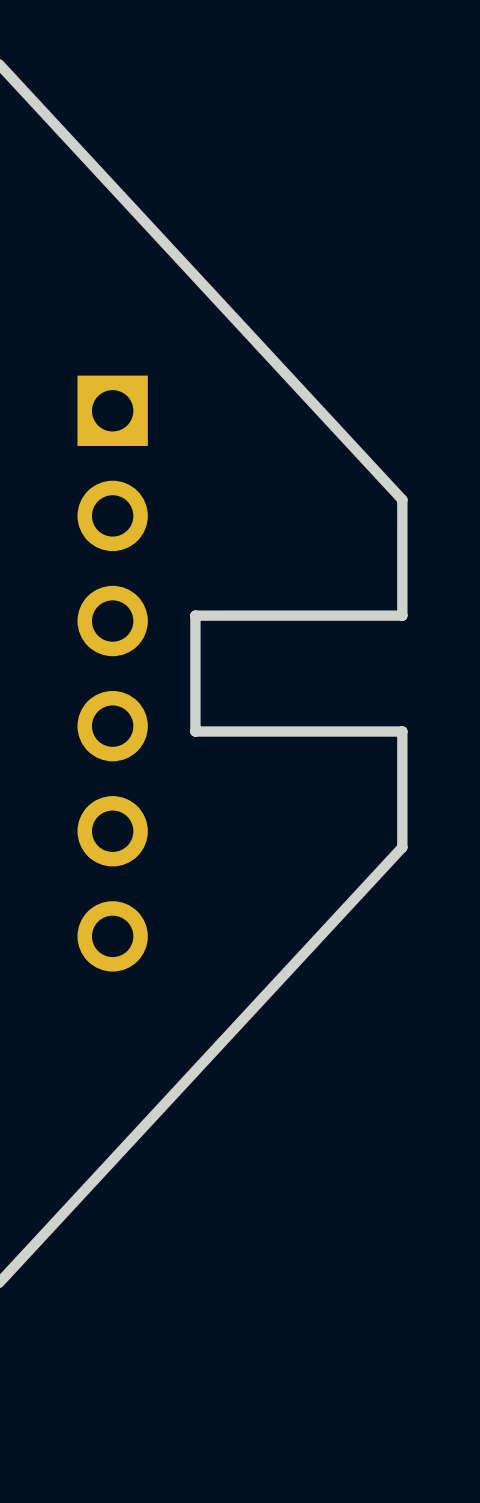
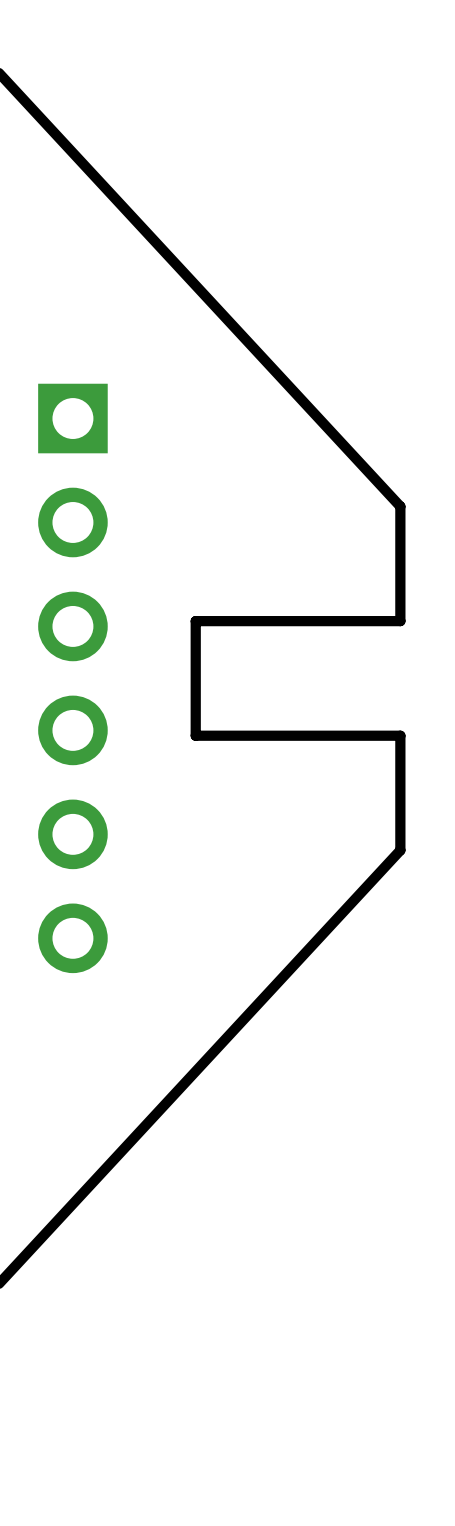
part position: (112, 673) -> (72, 678)

